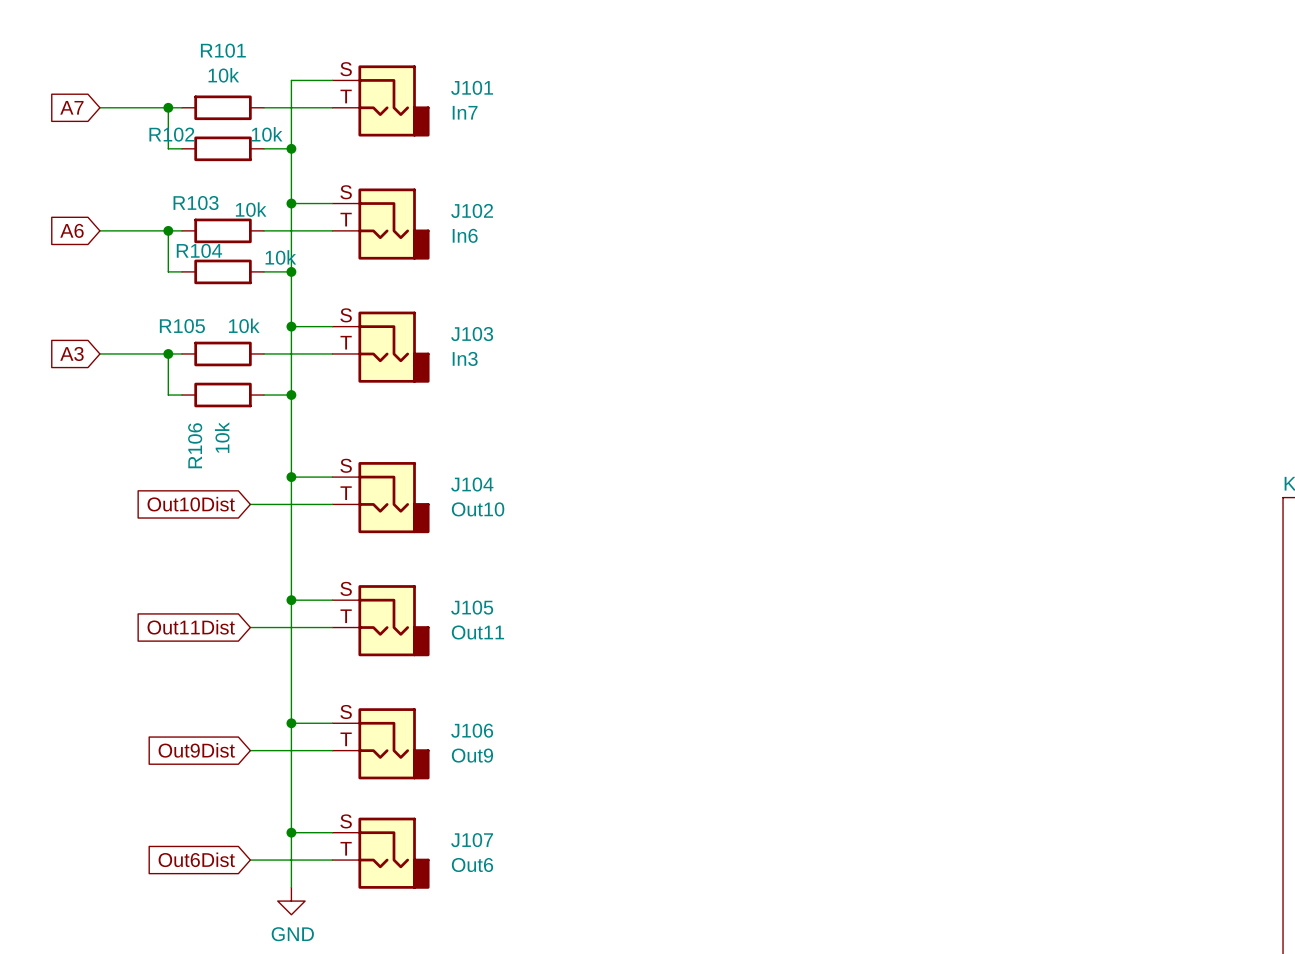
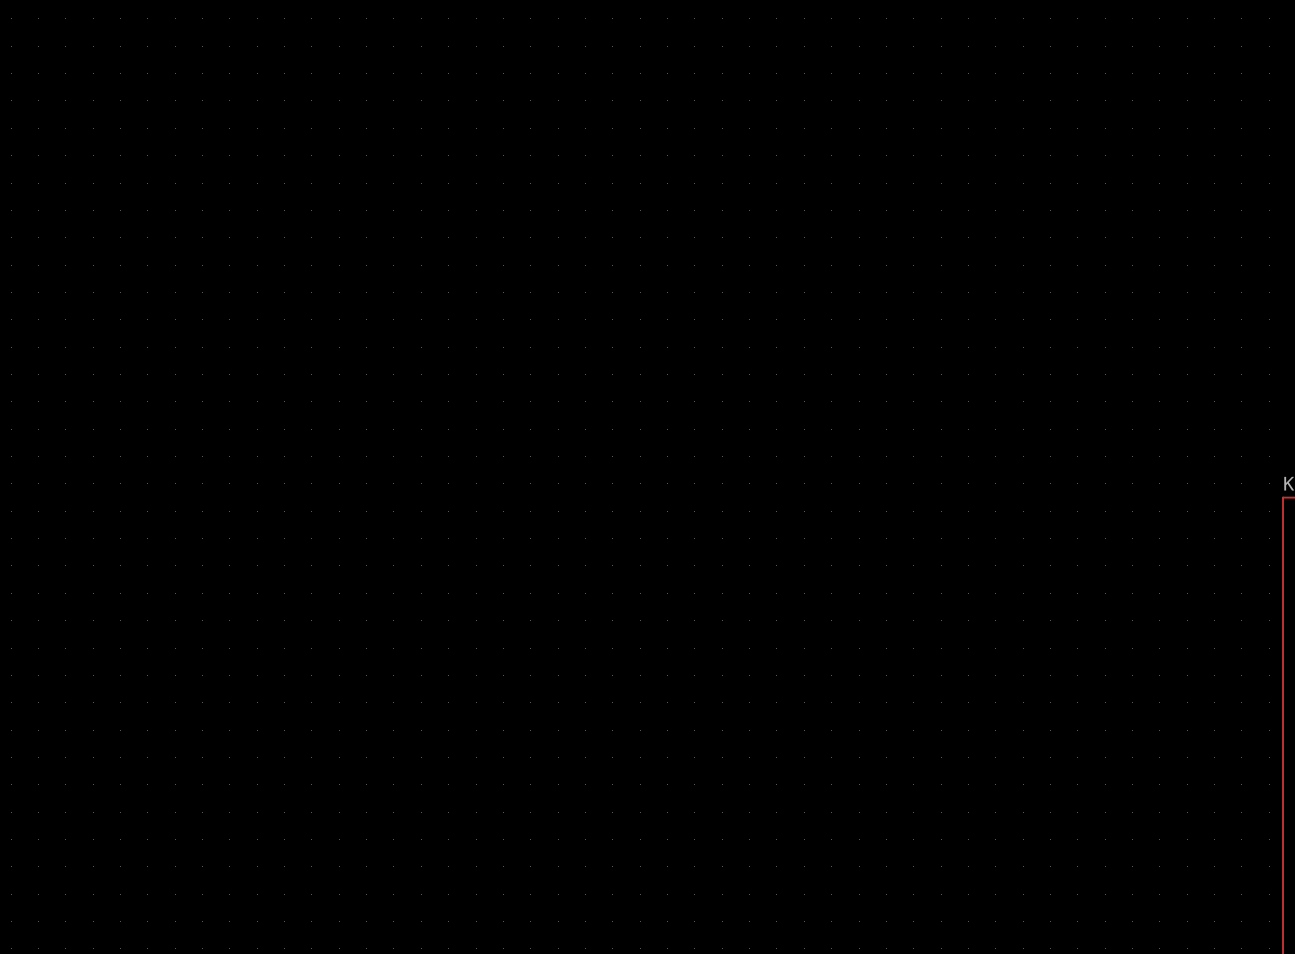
wire: (332, 80) (291, 80) (291, 887) -> none
J101: In7 (380, 100) -> none
global label: A7 (71, 107) -> none
wire: (99, 107) (181, 107) -> none
wire: (168, 107) (168, 148) (181, 148) -> none
junction: (168, 107) -> none
R101: 10k (223, 107) -> none
wire: (264, 107) (332, 107) -> none
R102: 10k (223, 148) -> none
wire: (264, 148) (291, 148) -> none
junction: (291, 148) -> none
wire: (291, 203) (332, 203) -> none
junction: (291, 203) -> none
J102: In6 (380, 224) -> none
global label: A6 (71, 230) -> none
wire: (99, 230) (181, 230) -> none
wire: (168, 230) (168, 271) (181, 271) -> none
junction: (168, 230) -> none
R103: 10k (223, 230) -> none
wire: (264, 230) (332, 230) -> none
R104: 10k (223, 271) -> none
wire: (264, 271) (291, 271) -> none
junction: (291, 271) -> none
wire: (291, 326) (332, 326) -> none
junction: (291, 326) -> none
J103: In3 (380, 347) -> none
global label: A3 (71, 353) -> none
wire: (99, 353) (181, 353) -> none
wire: (168, 353) (168, 395) (181, 395) -> none
junction: (168, 353) -> none
R105: 10k (223, 353) -> none
wire: (264, 353) (332, 353) -> none
R106: 10k (223, 395) -> none
wire: (264, 395) (291, 395) -> none
junction: (291, 395) -> none
wire: (291, 477) (332, 477) -> none
junction: (291, 477) -> none
J104: Out10 (380, 497) -> none
global label: Out10Dist (191, 504) -> none
wire: (250, 504) (332, 504) -> none
wire: (291, 600) (332, 600) -> none
junction: (291, 600) -> none
J105: Out11 (380, 620) -> none
global label: Out11Dist (191, 627) -> none
wire: (250, 627) (332, 627) -> none
wire: (291, 723) (332, 723) -> none
junction: (291, 723) -> none
J106: Out9 (380, 743) -> none
global label: Out9Dist (196, 750) -> none
wire: (250, 750) (332, 750) -> none
wire: (291, 832) (332, 832) -> none
junction: (291, 832) -> none
J107: Out6 (380, 853) -> none
global label: Out6Dist (196, 859) -> none
wire: (250, 860) (332, 860) -> none
power symbol: GND (291, 901) -> none

